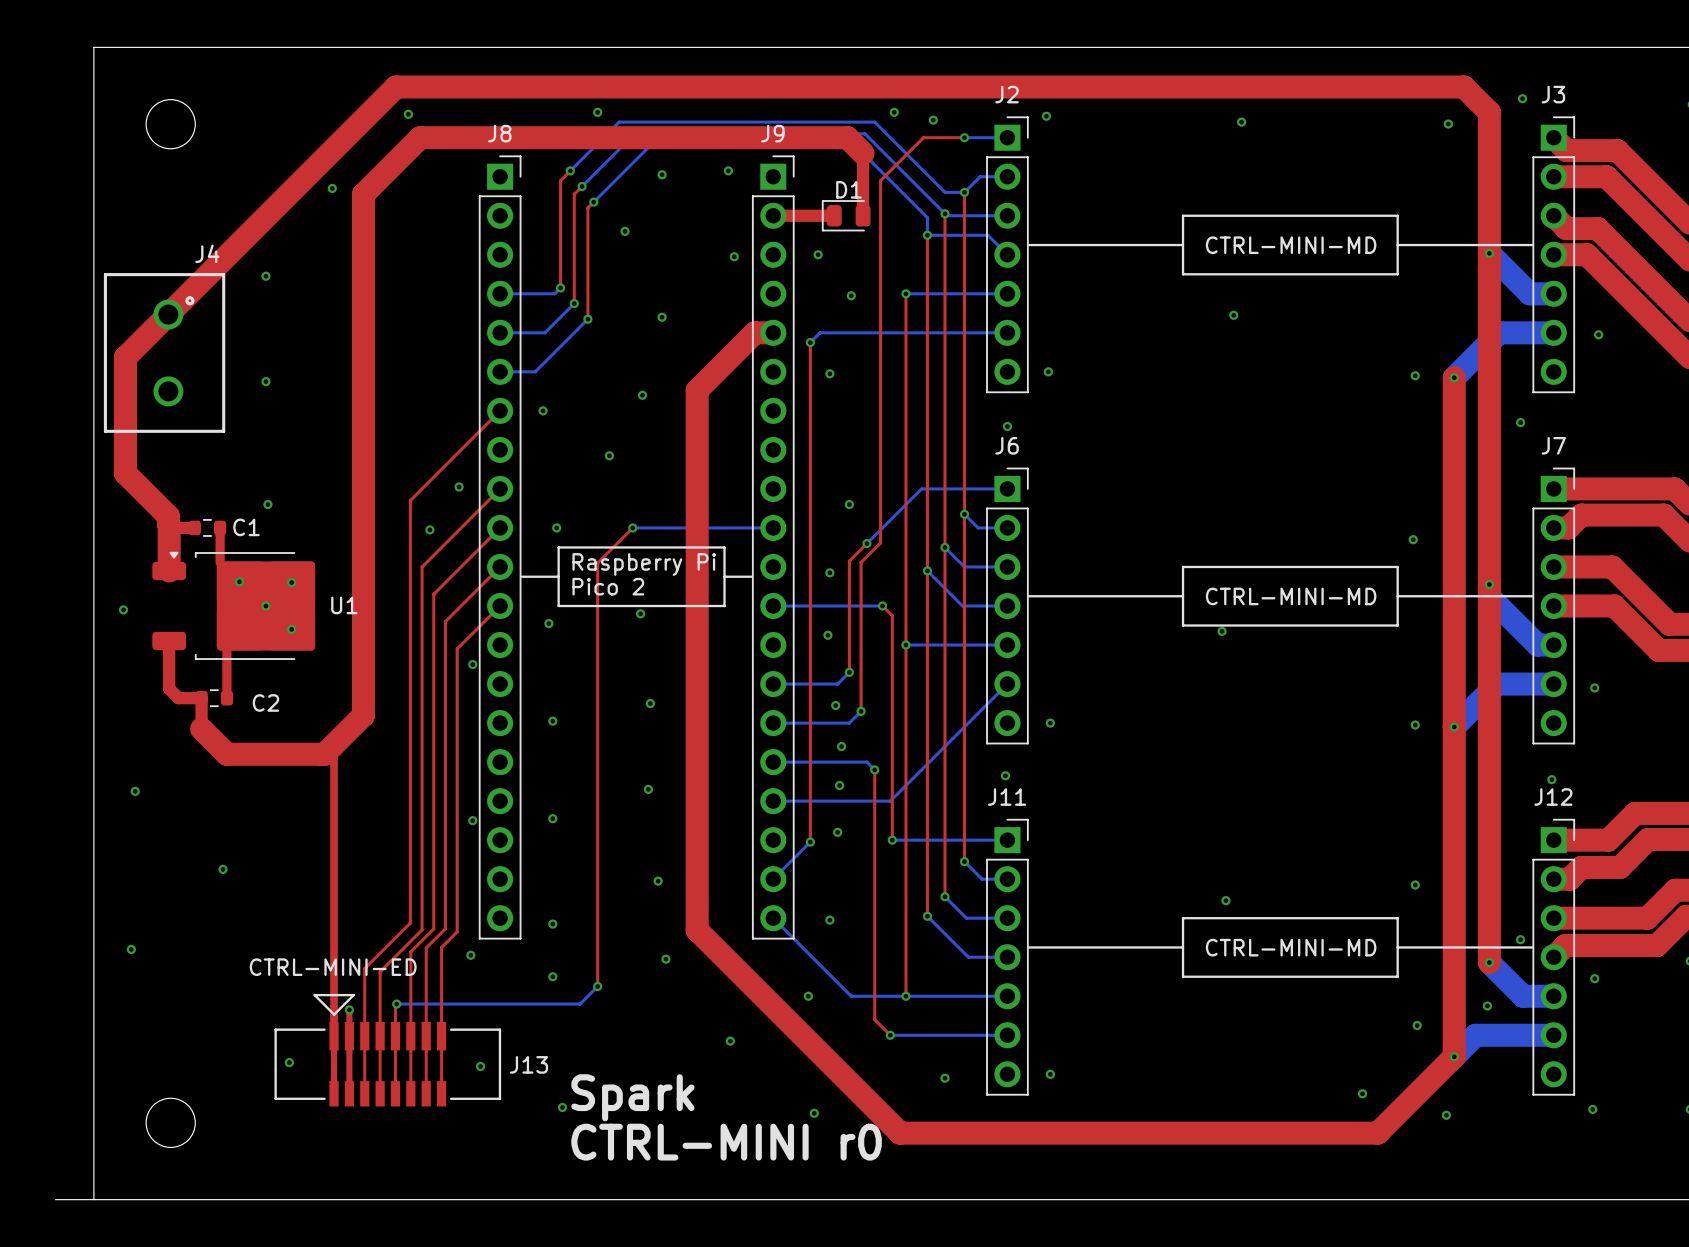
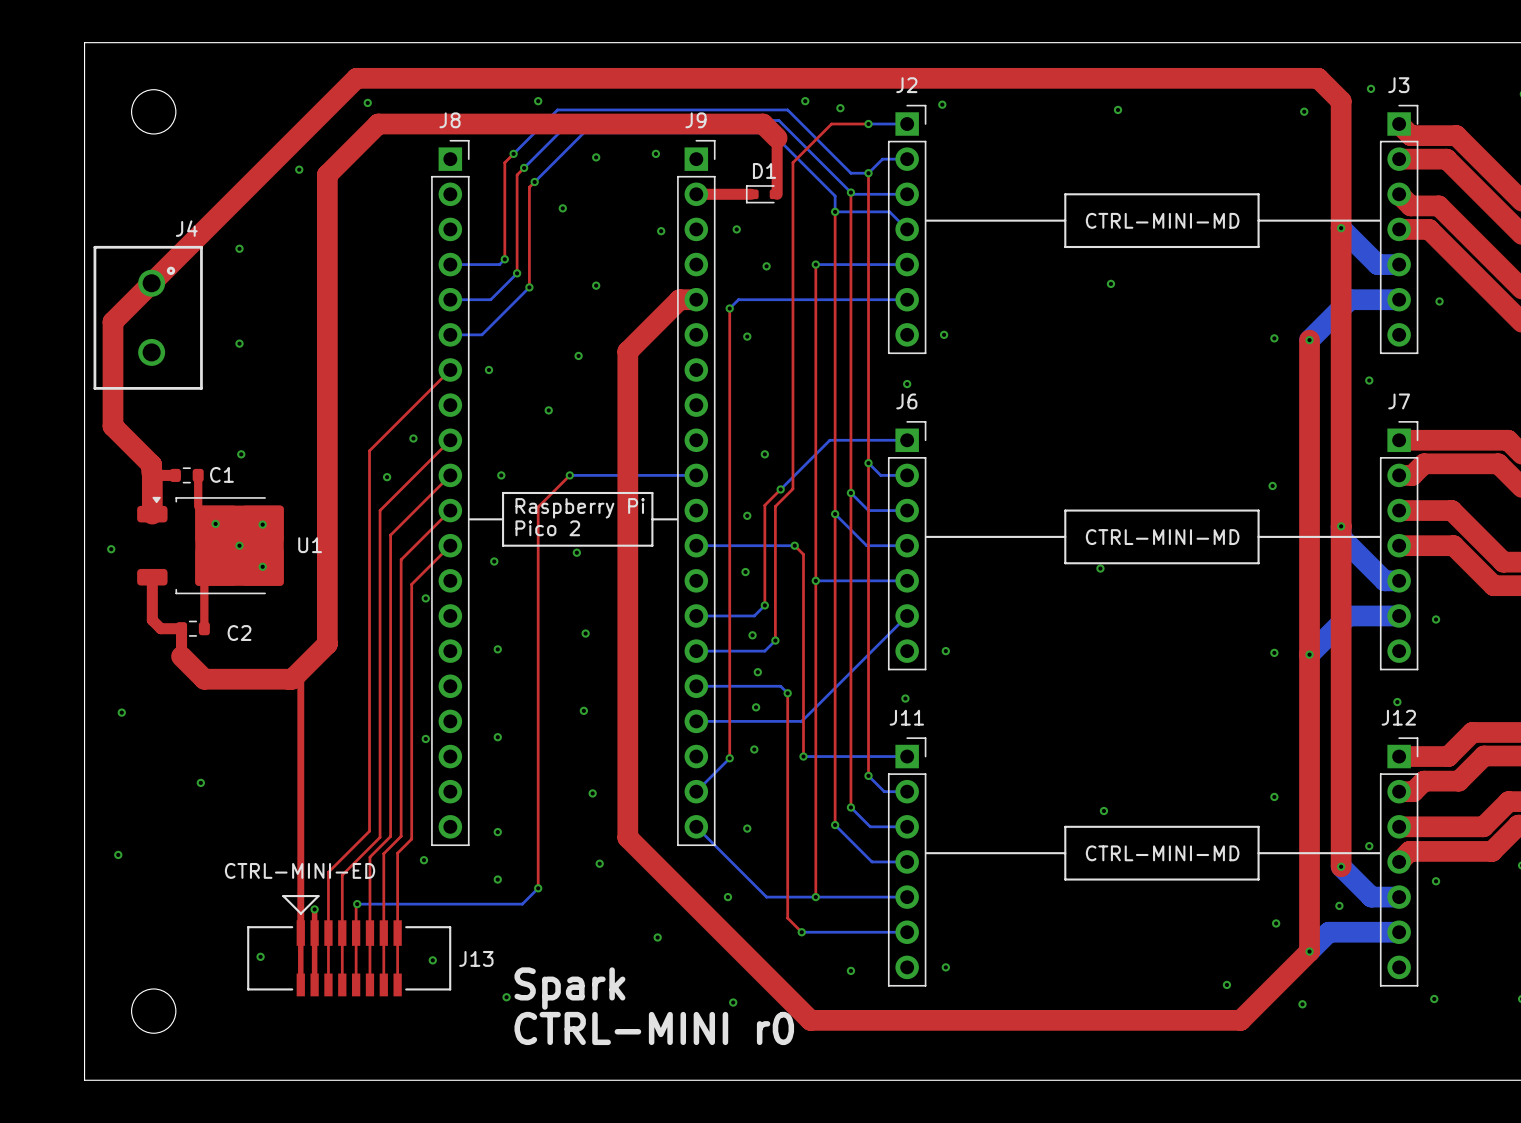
D1 footprint: [821, 200, 871, 232] -> [745, 185, 779, 204]
board edge: (55, 1199) (93, 1199) -> none

